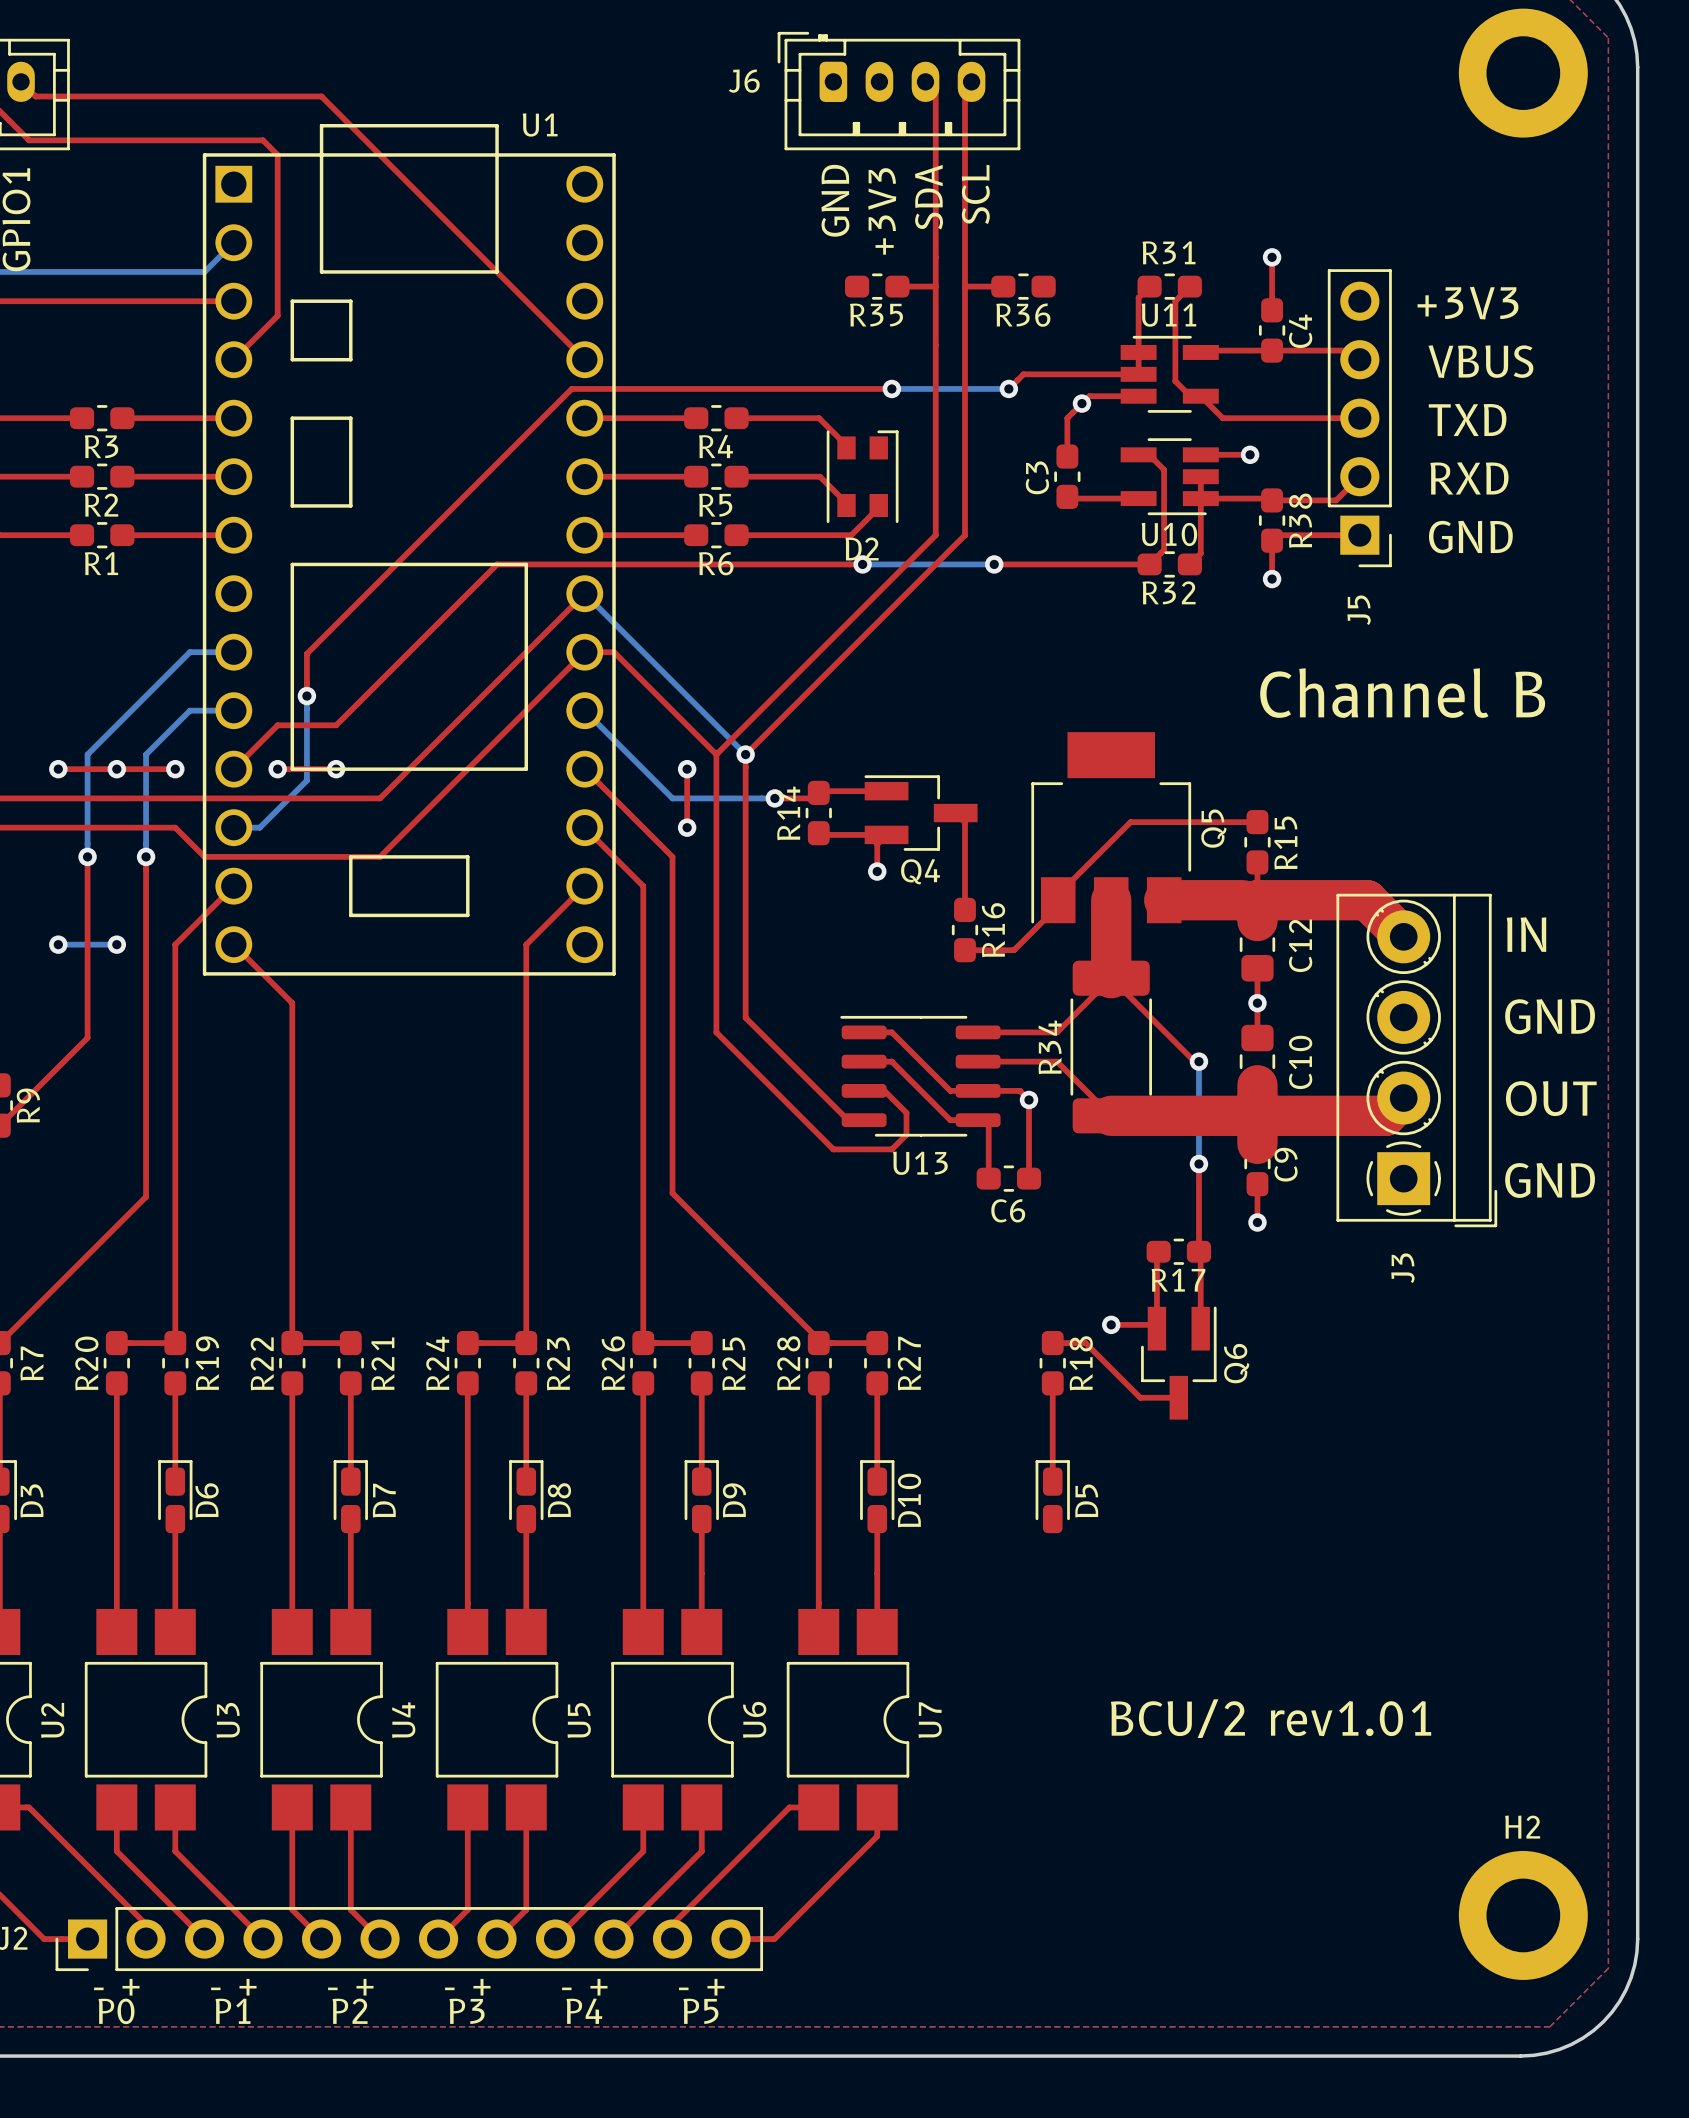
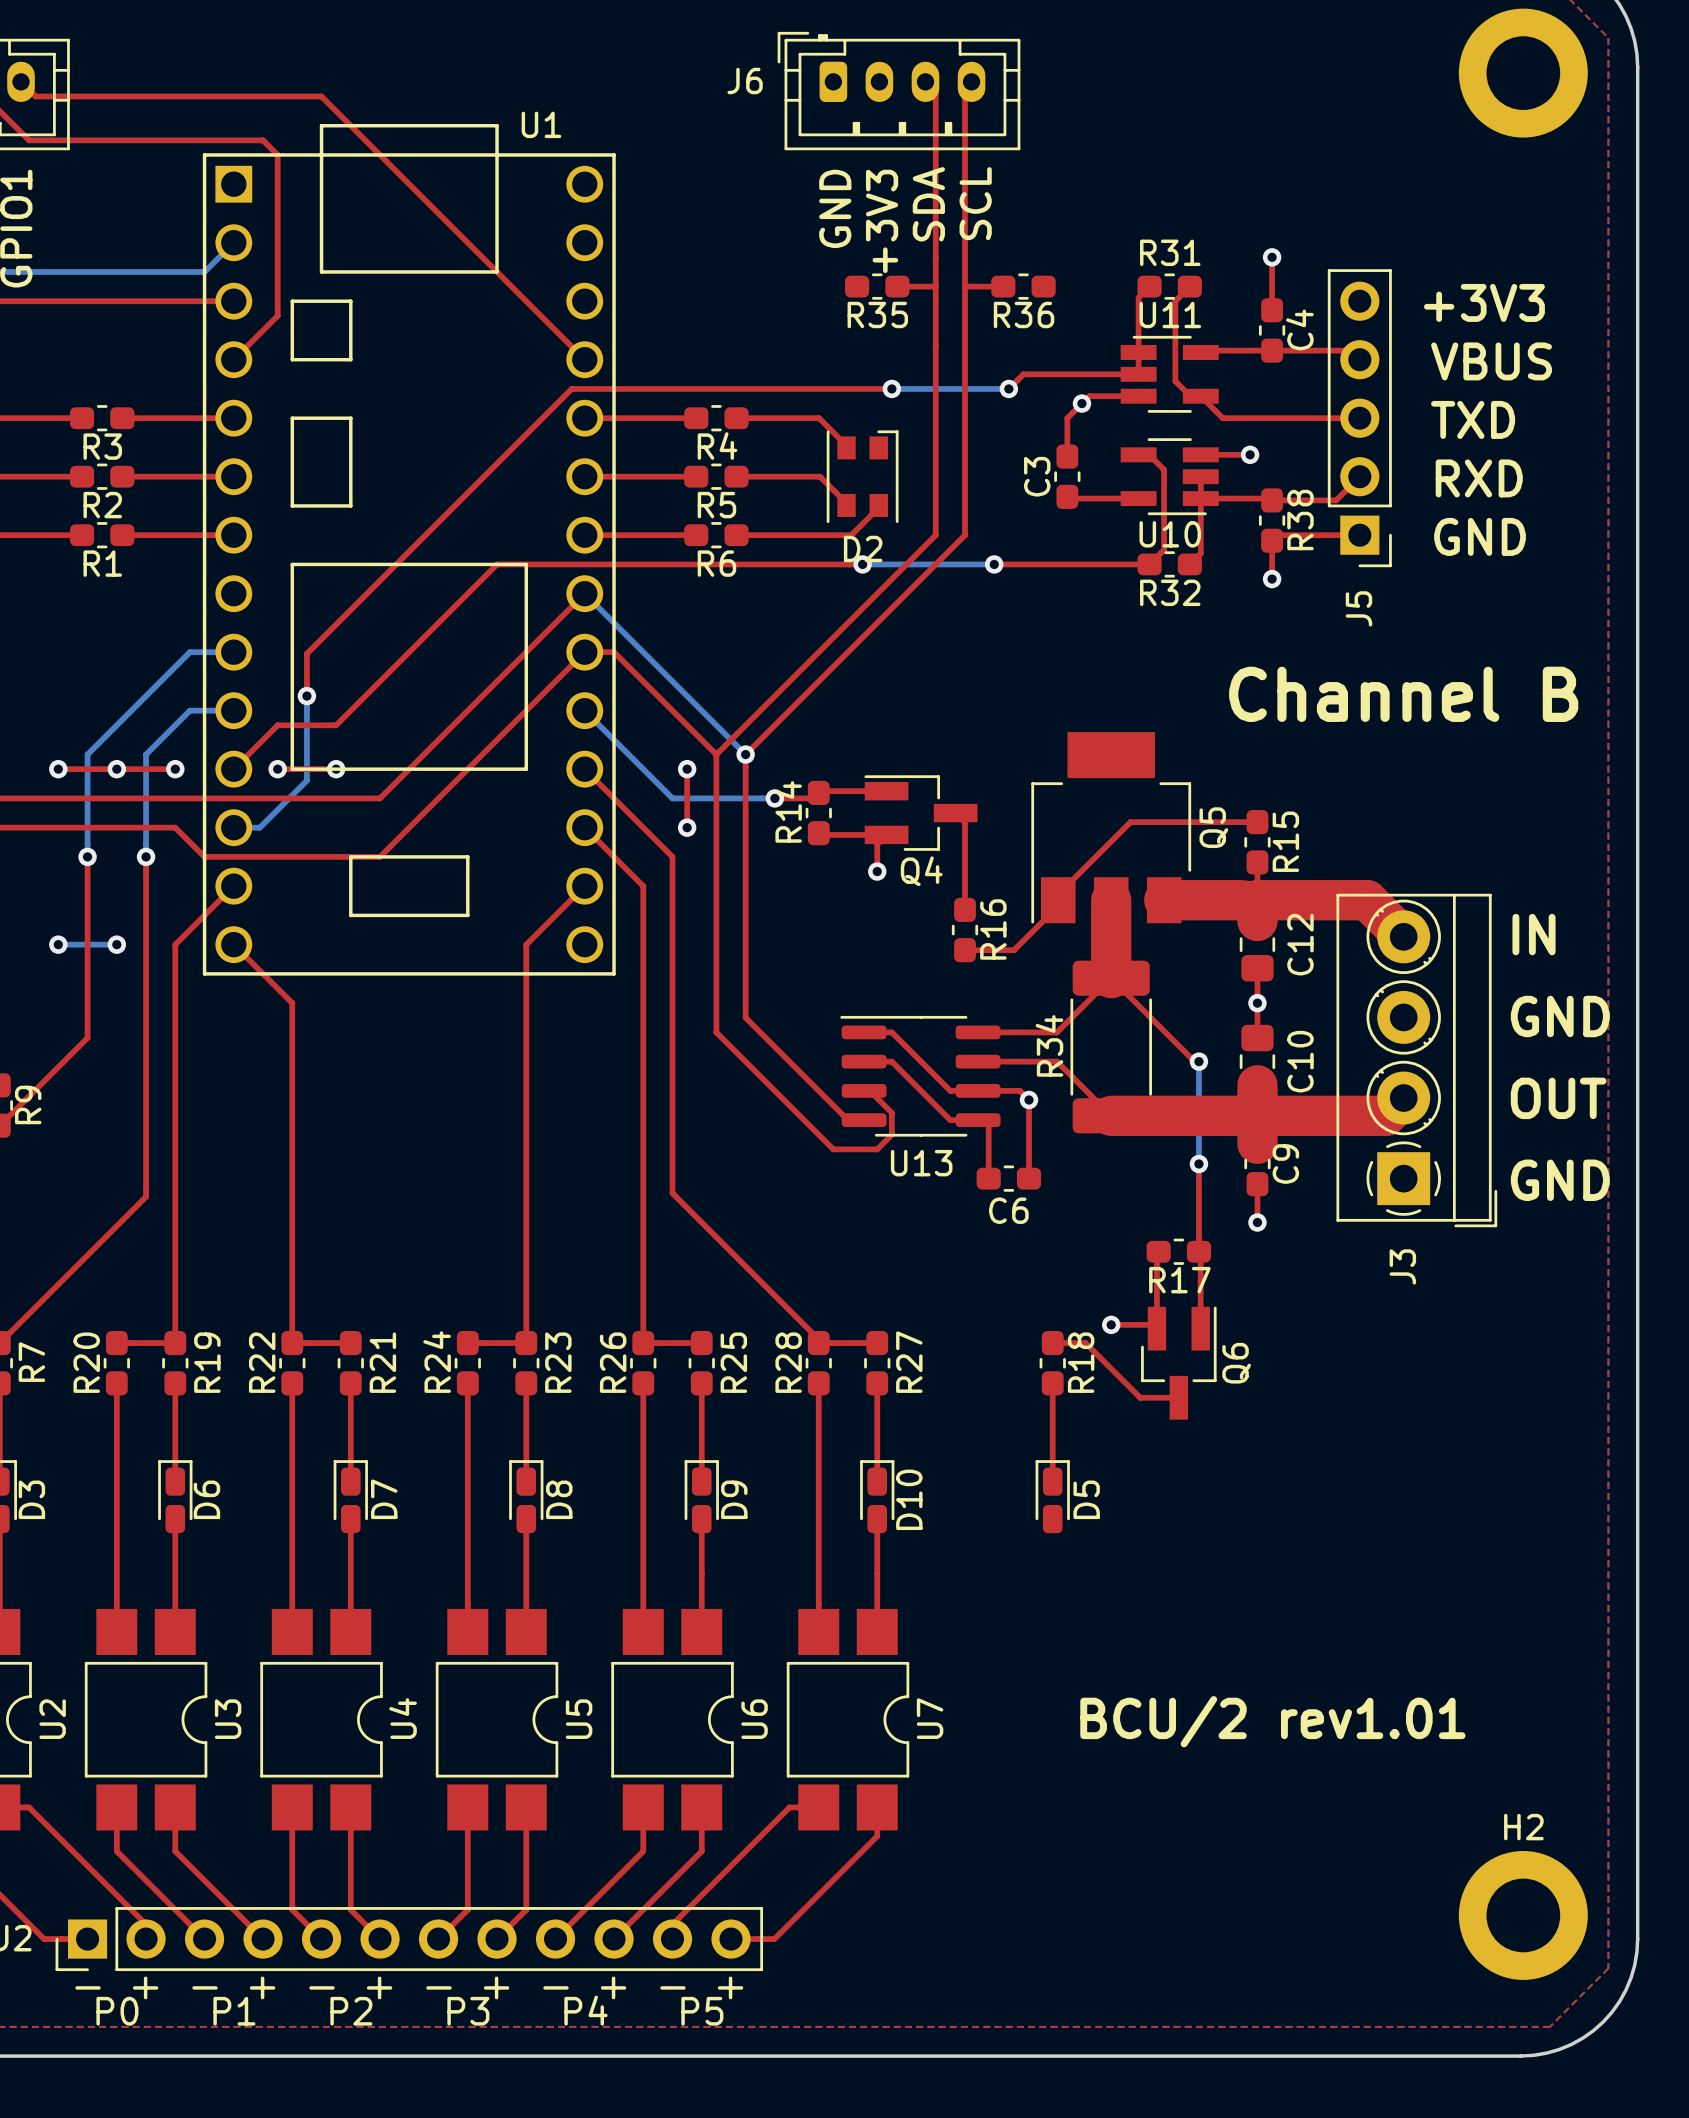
top track: (864, 1090) (884, 1090) (906, 1112) (906, 1134) (891, 1149) (877, 1149) -> (869, 1090) (891, 1112) (891, 1134) (877, 1149)

